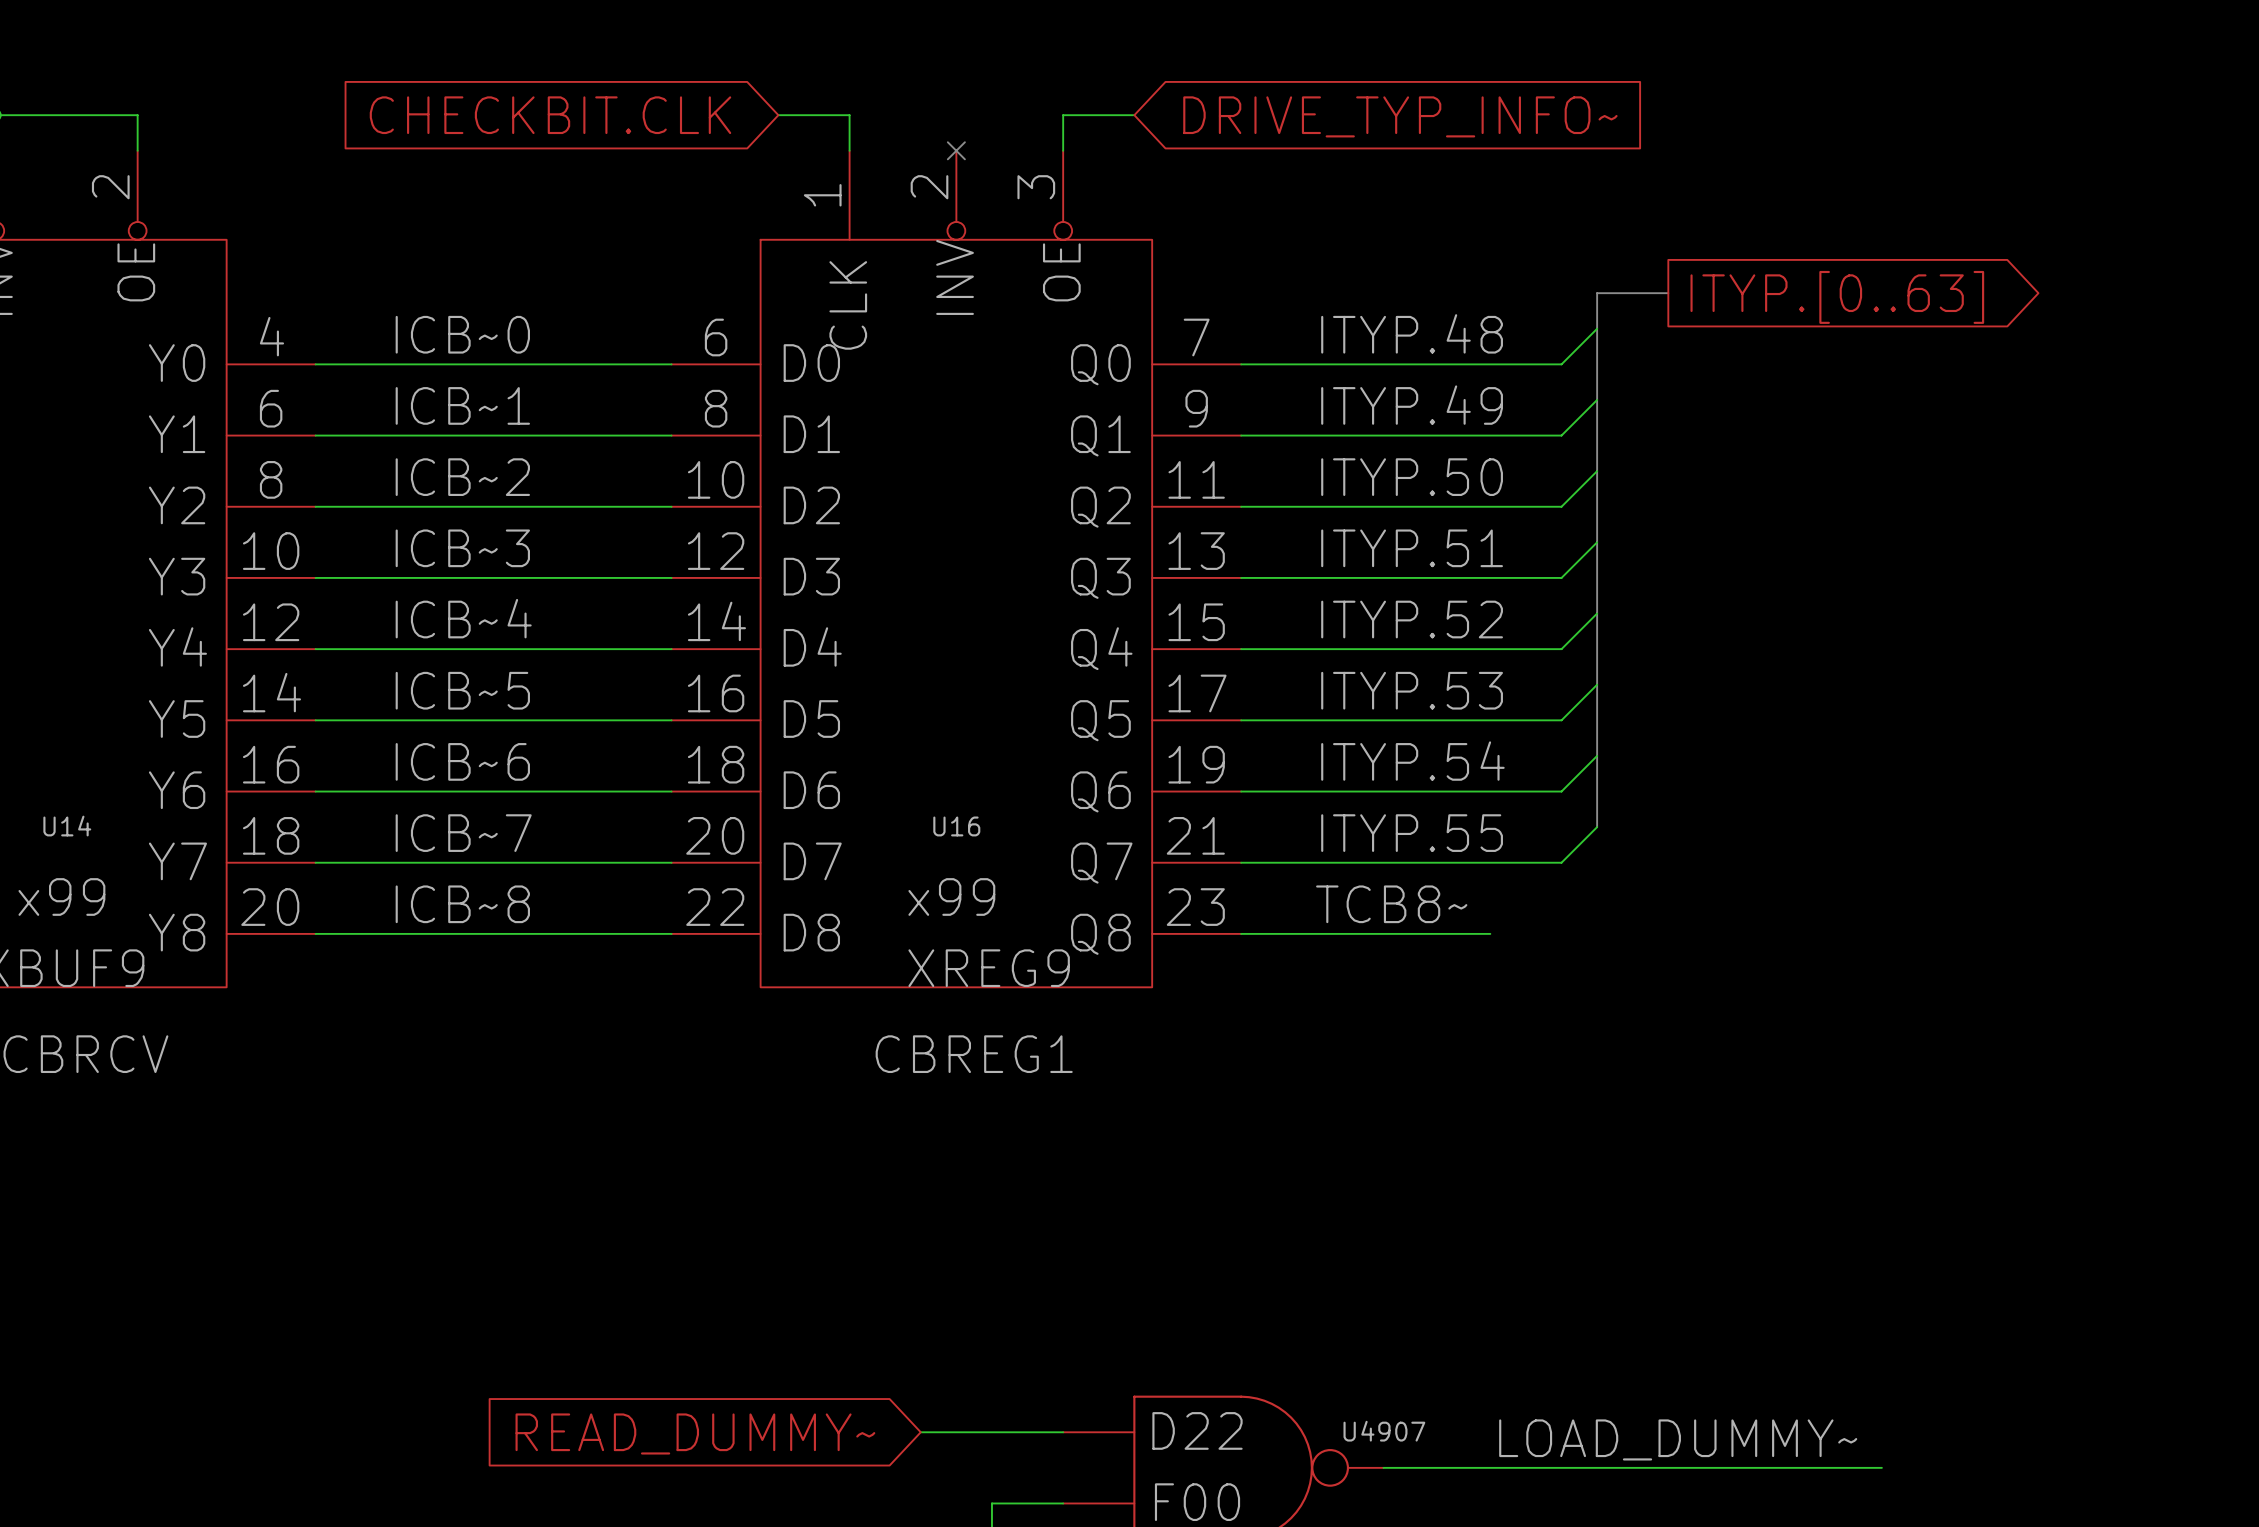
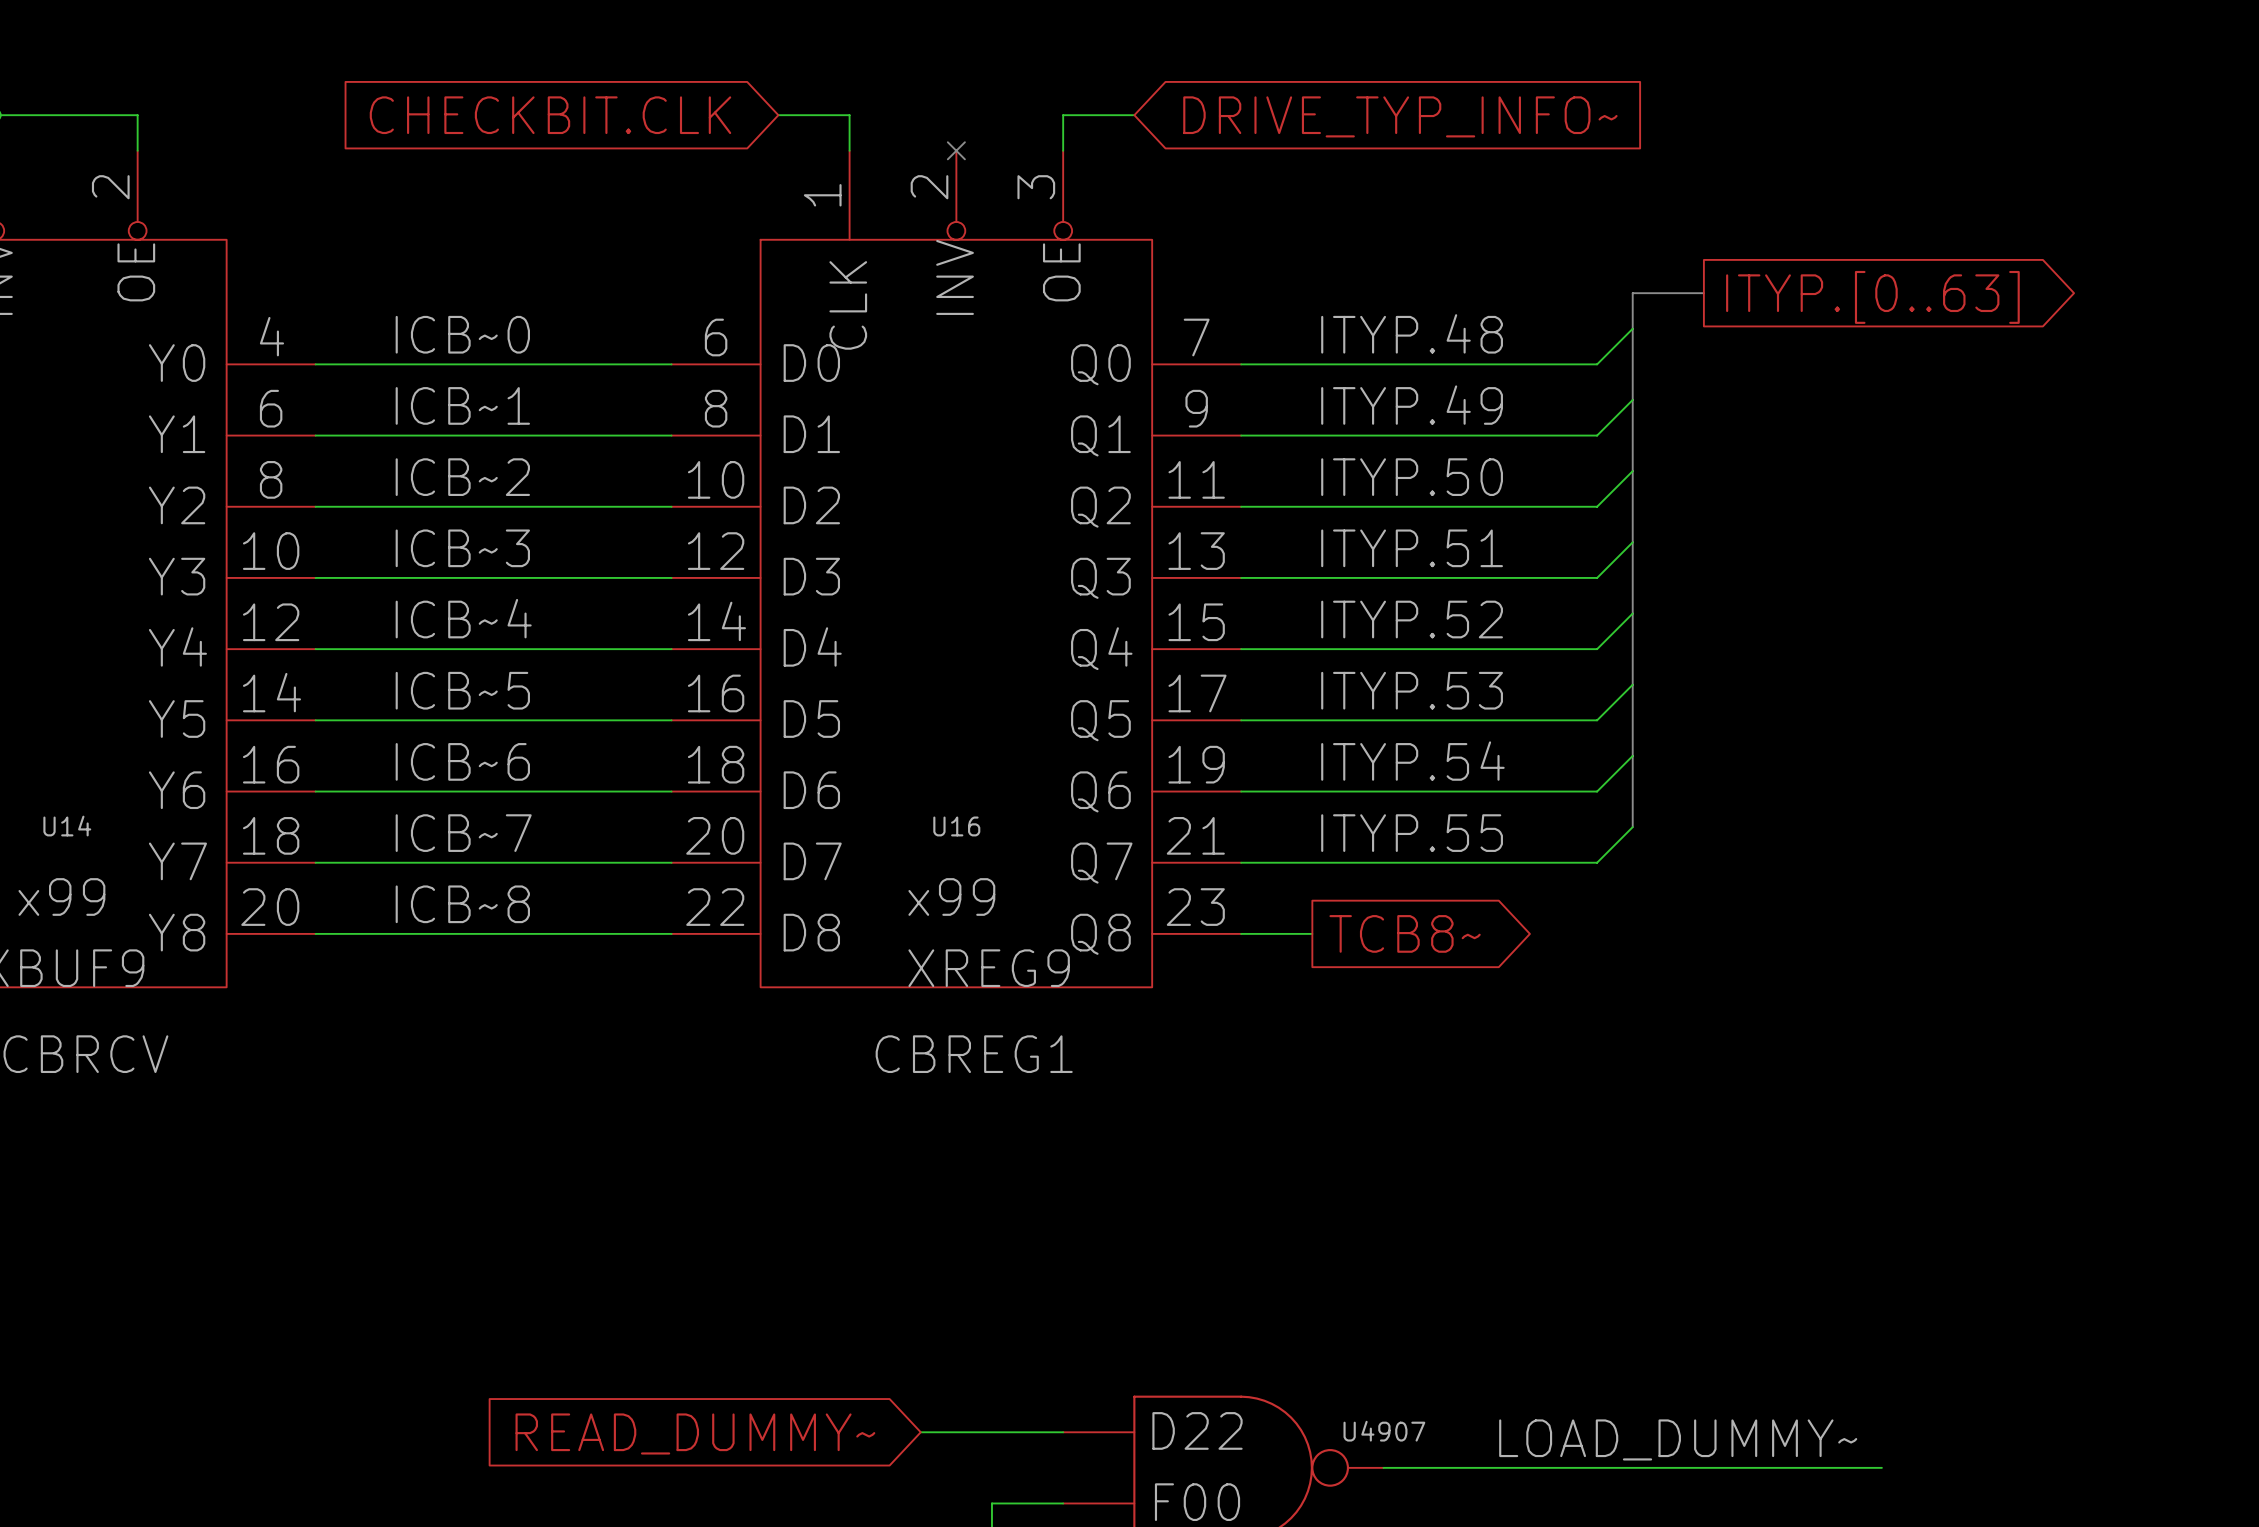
bus: (1632, 293) (1597, 293) (1597, 827) -> (1632, 293) (1632, 827)
bus: none -> (1668, 293) (1703, 293)
global label position: ITYP.[0..63] (1837, 297) -> ITYP.[0..63] (1872, 297)
wire: (1597, 328) (1561, 364) -> (1632, 328) (1597, 364) (1561, 364)
wire: (1597, 399) (1561, 435) -> (1632, 399) (1597, 435) (1561, 435)
wire: (1597, 471) (1561, 506) -> (1632, 471) (1597, 506) (1561, 506)
wire: (1597, 542) (1561, 577) -> (1632, 542) (1597, 577) (1561, 577)
wire: (1597, 613) (1561, 649) -> (1632, 613) (1597, 649) (1561, 649)
wire: (1597, 684) (1561, 720) -> (1632, 684) (1597, 720) (1561, 720)
wire: (1597, 755) (1561, 791) -> (1632, 755) (1597, 791) (1561, 791)
wire: (1597, 827) (1561, 862) -> (1632, 827) (1597, 862) (1561, 862)
label: TCB8~ (1391, 904) -> none
wire: (1312, 933) (1490, 933) -> none
global label: none -> TCB8~ (1405, 933)

